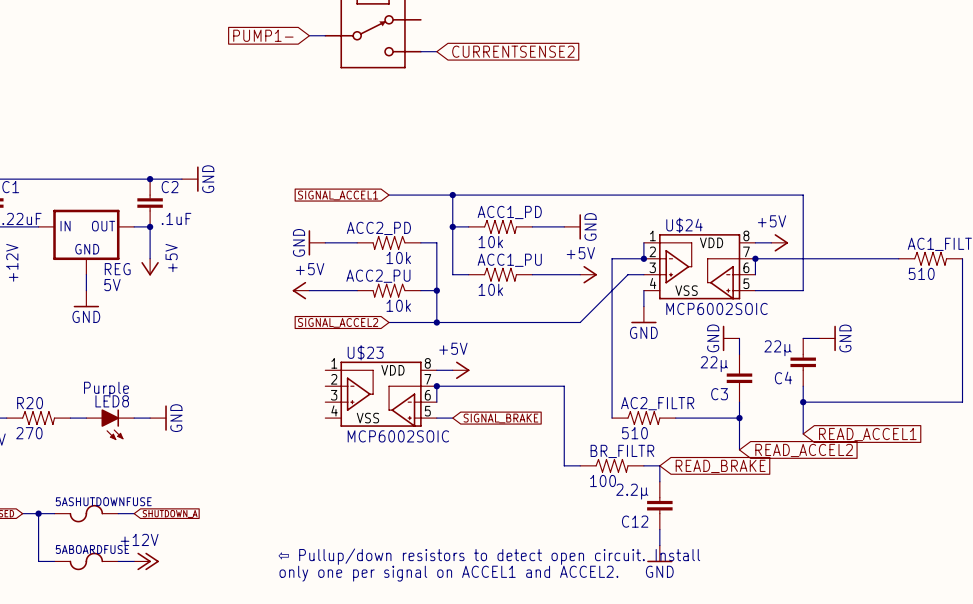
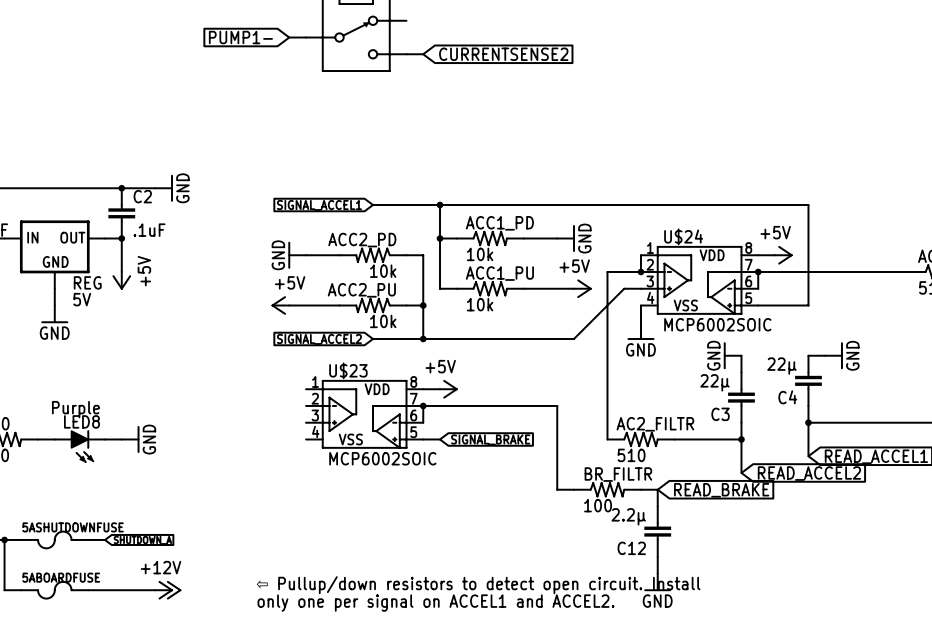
wire: none -> (105, 590) (155, 590)
power symbol position: +12V (146, 561) -> +12V (168, 590)

